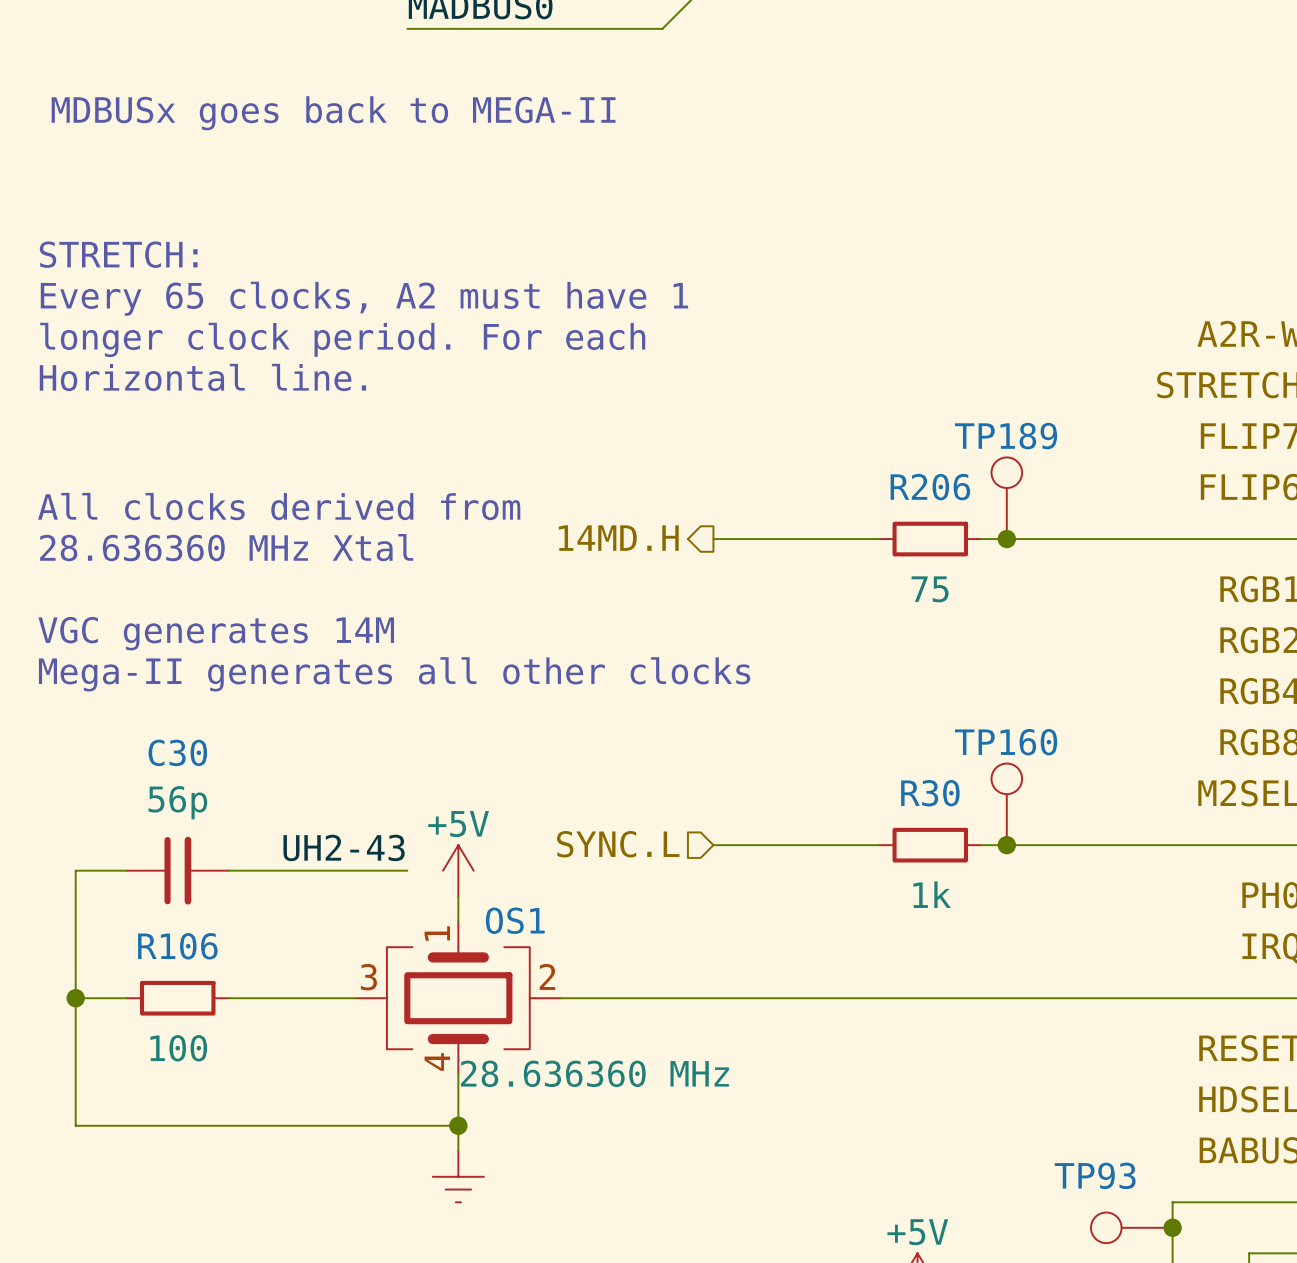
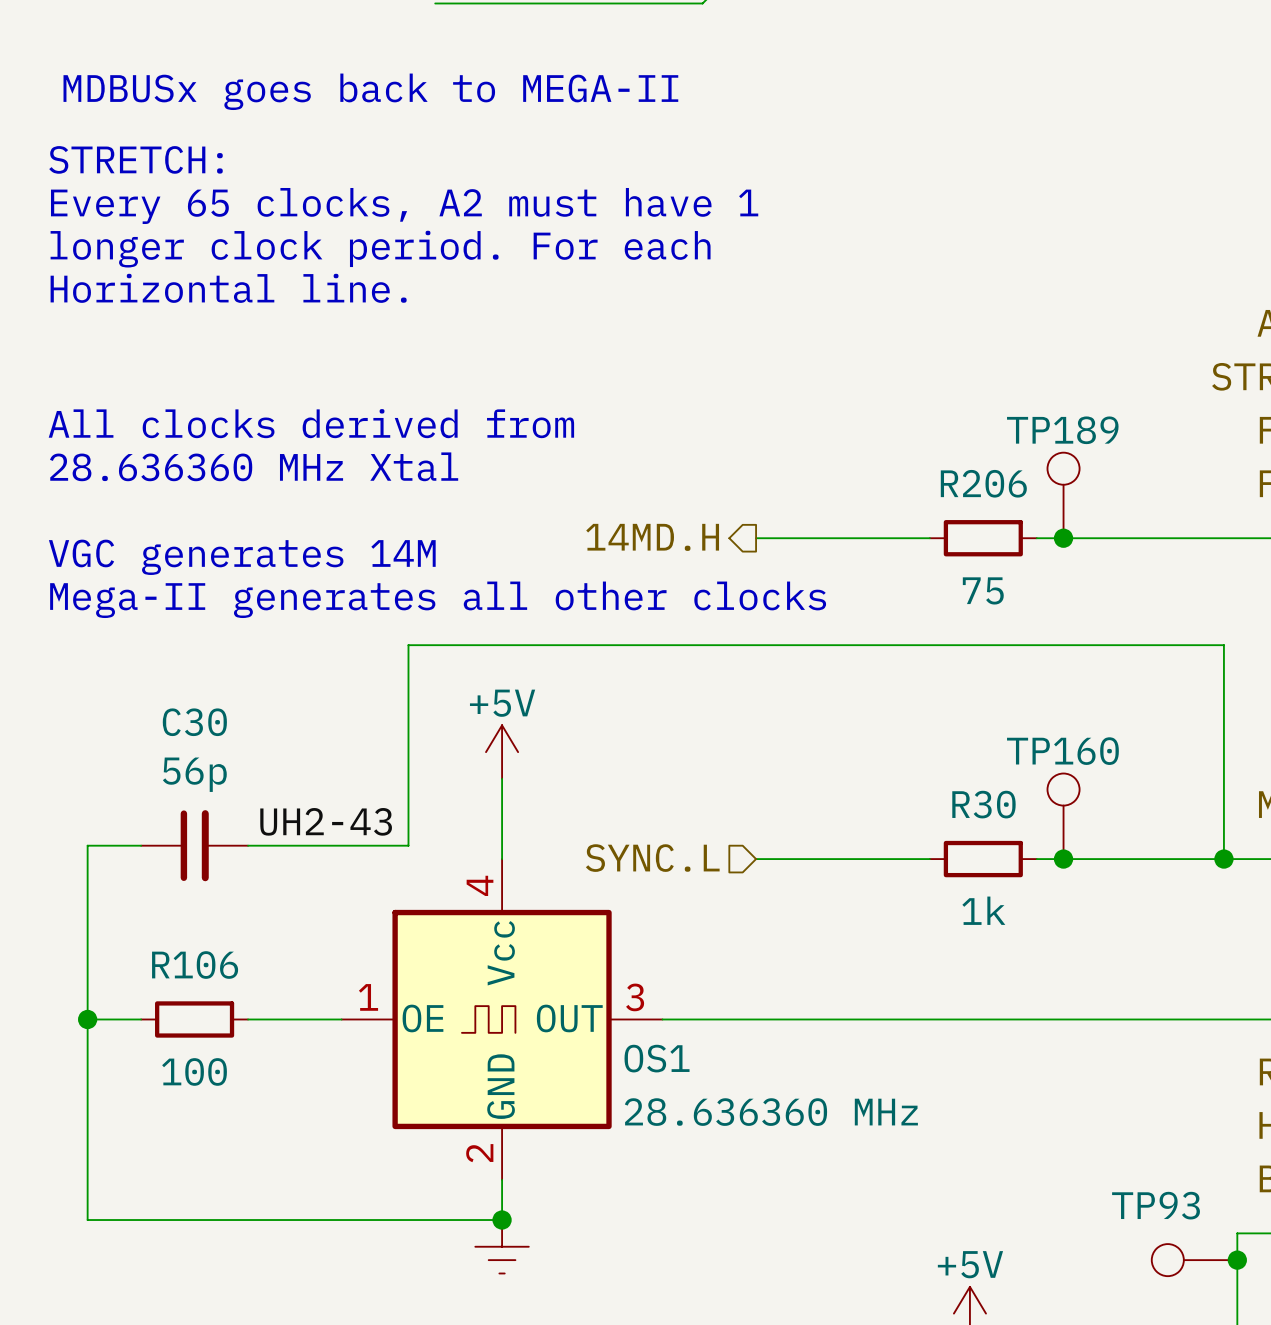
text position: STRETCH: (118, 254) -> STRETCH: (136, 159)
text position: Every 65 clocks, A2 must have 1 (364, 298) -> Every 65 clocks, A2 must have 1 (404, 205)
text position: longer clock period. For each (342, 339) -> longer clock period. For each (380, 249)
text position: Horizontal line. (202, 377) -> Horizontal line. (228, 288)
text position: All clocks derived from (279, 506) -> All clocks derived from (311, 423)
text position: 28.636360 MHz Xtal (226, 547) -> 28.636360 MHz Xtal (254, 466)
text position: VGC generates 14M (216, 633) -> VGC generates 14M (242, 557)
text position: Mega-II generates all other clocks (394, 674) -> Mega-II generates all other clocks (438, 599)
wire: none -> (248, 845) (408, 845) (408, 645) (1223, 645) (1223, 859)
junction: none -> (1223, 859)
label position: UH2-43 (344, 847) -> UH2-43 (326, 821)
wire: (75, 870) (126, 870) -> (87, 885) (87, 845) (141, 845)
C30 position: (177, 870) -> (194, 845)
wire: (228, 870) (407, 870) -> none
power symbol position: +5V (458, 870) -> +5V (502, 752)
OS1 name position: OS1 (515, 920) -> OS1 (657, 1058)
OS1 symbol: [356, 921, 561, 1075] -> [341, 859, 663, 1180]
OS1 value position: 28.636360 MHz (594, 1073) -> 28.636360 MHz (771, 1112)
wire: (458, 1074) (458, 1151) -> (502, 778) (502, 859)
wire: (75, 1125) (458, 1125) -> (87, 1153) (87, 1220) (502, 1220) (502, 1179)
junction position: (458, 1125) -> (502, 1220)
power symbol position: (458, 1176) -> (502, 1246)

